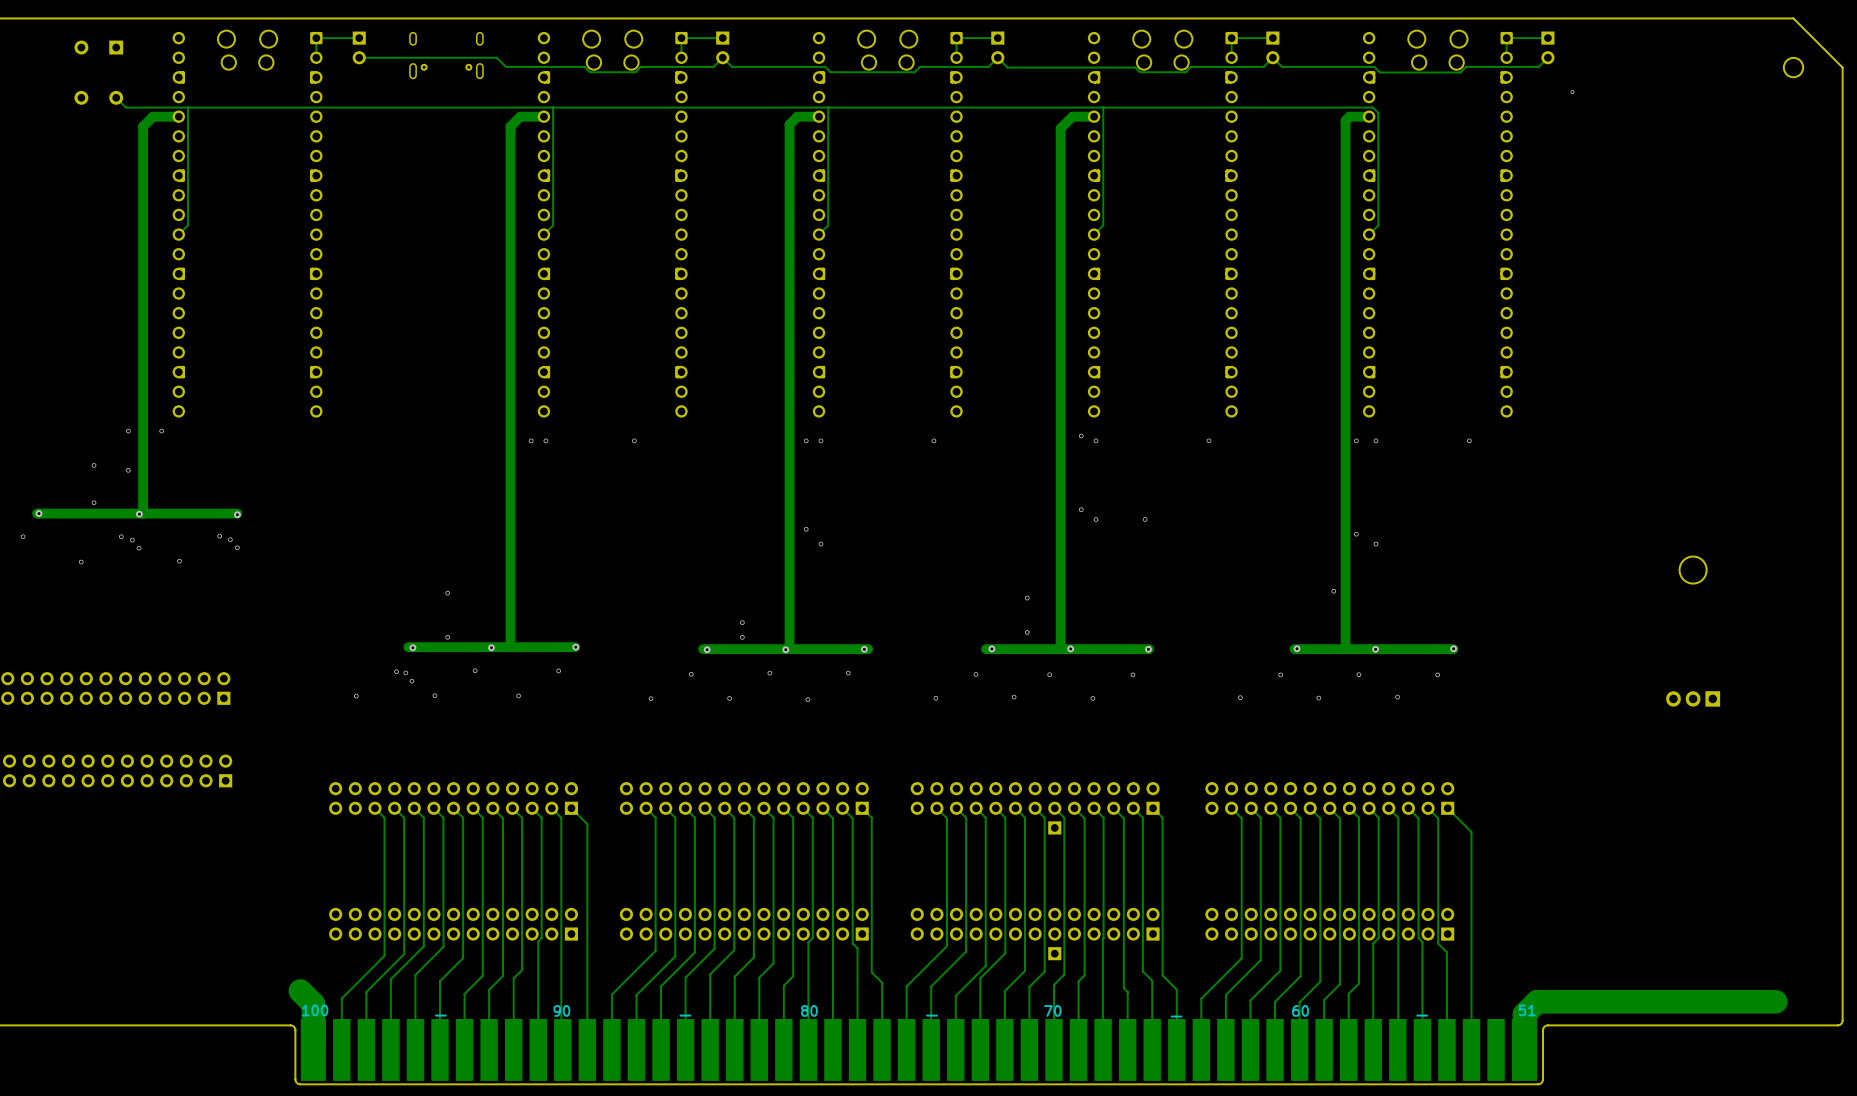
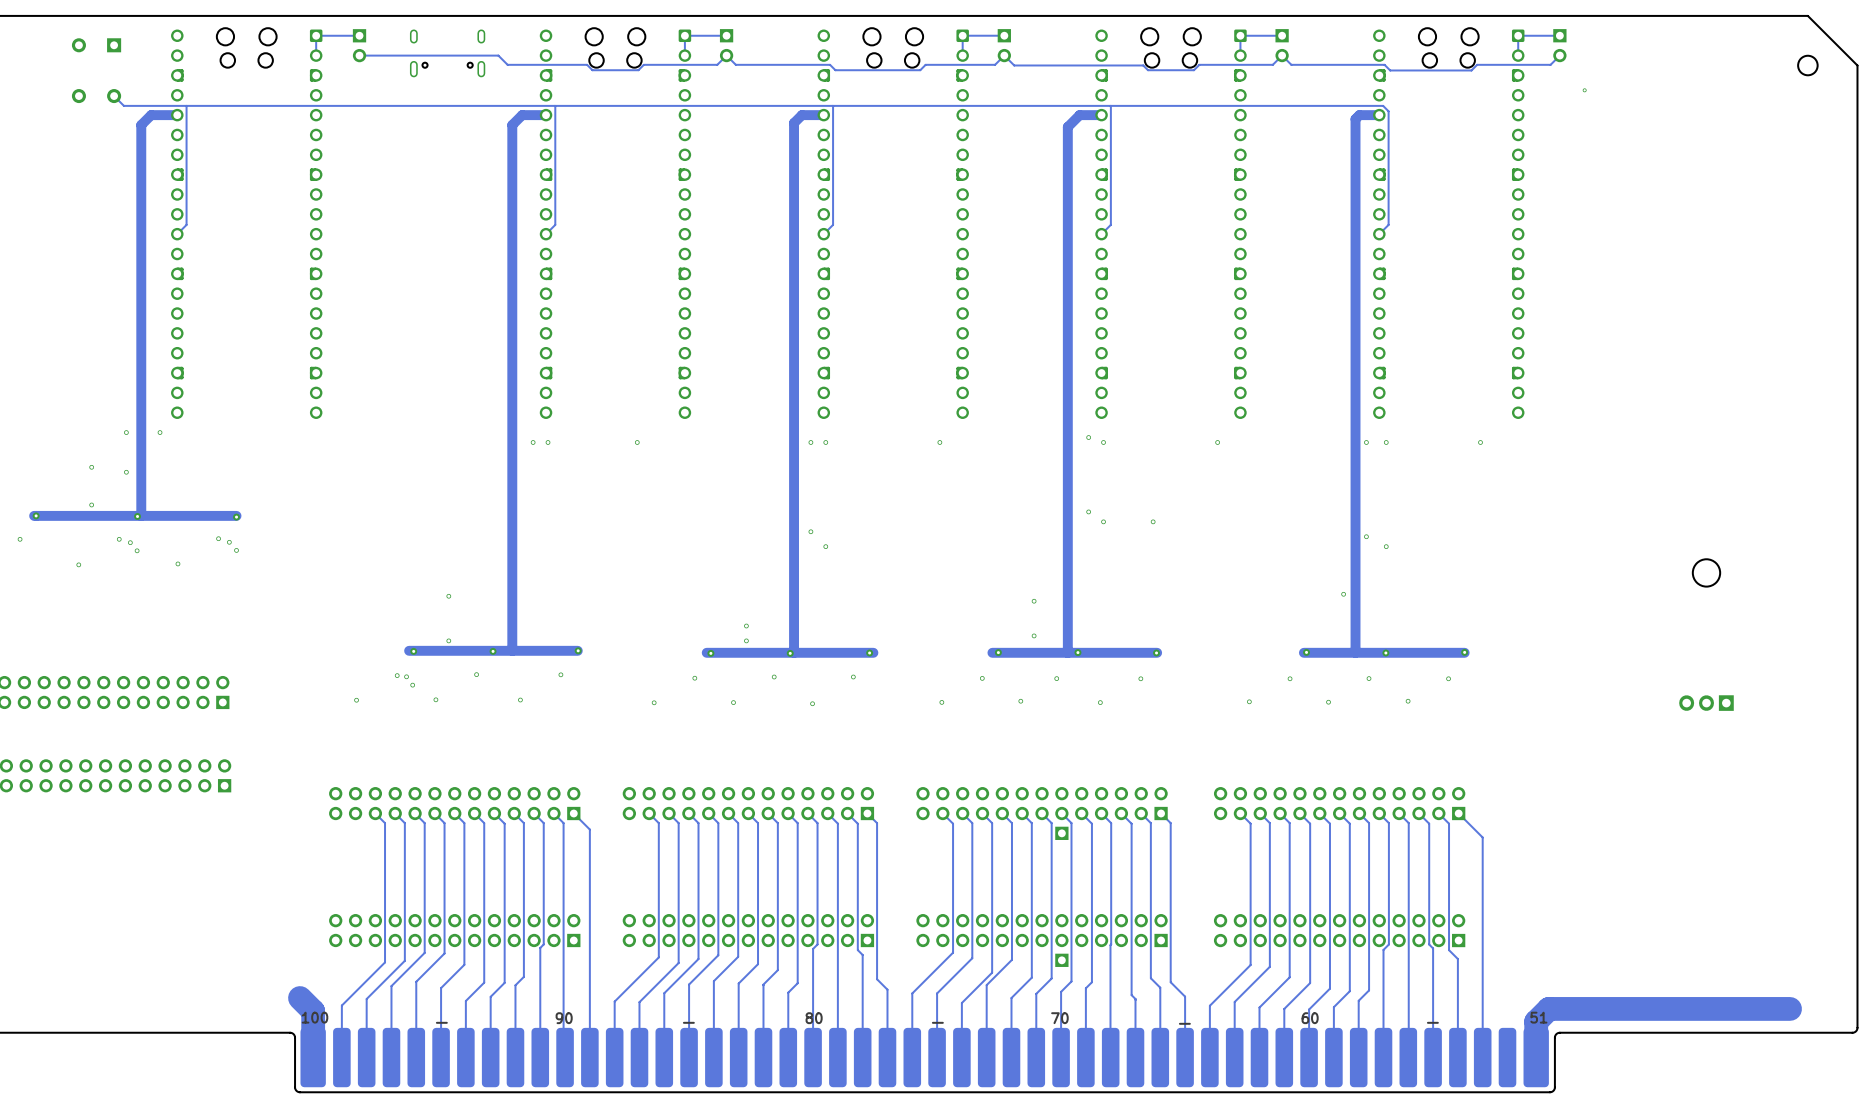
part footprint: [300, 1019, 1538, 1081] -> [300, 1027, 1549, 1088]

